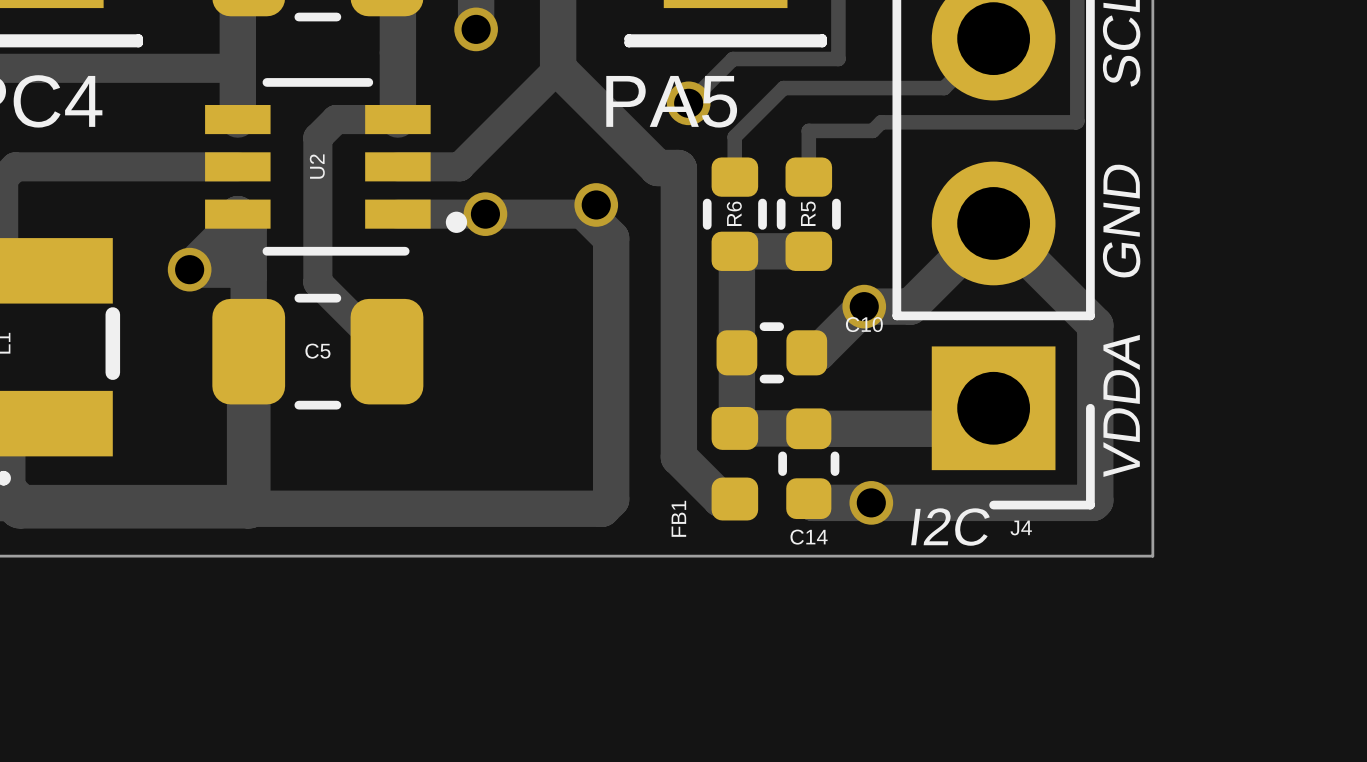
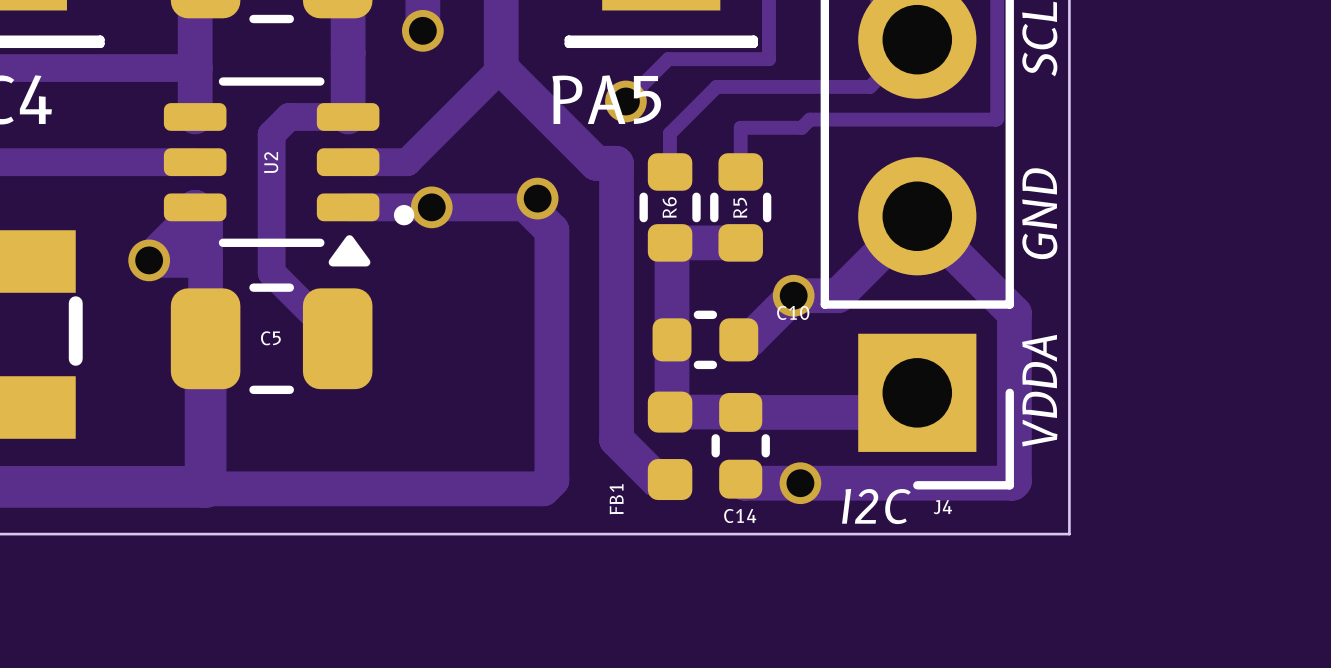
U2 footprint: [205, 78, 431, 256] -> [163, 77, 380, 267]

